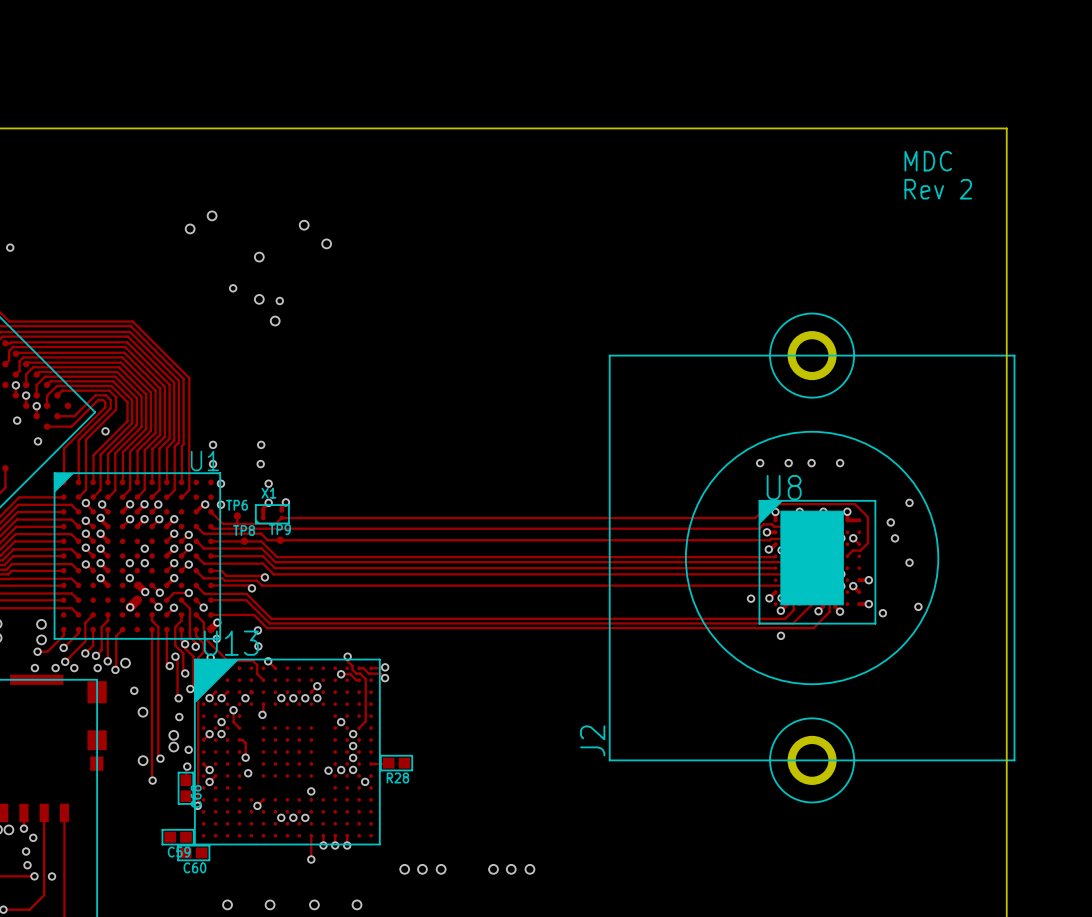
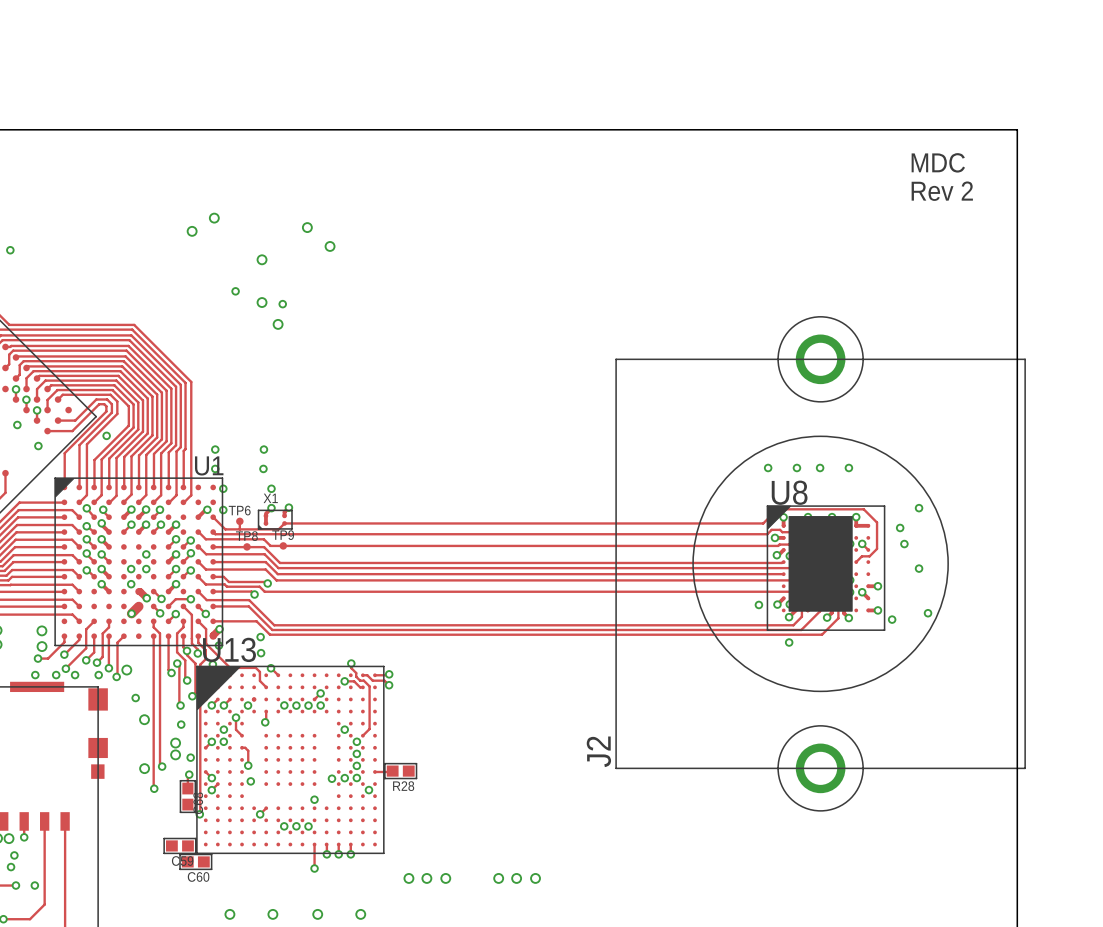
via: (33, 837) -> none
via: none -> (14, 855)
via: (26, 851) -> none
via: none -> (11, 867)
via: (27, 865) -> none
track: (15, 876) (34, 876) -> none
via: none -> (15, 885)
via: (52, 876) -> none

